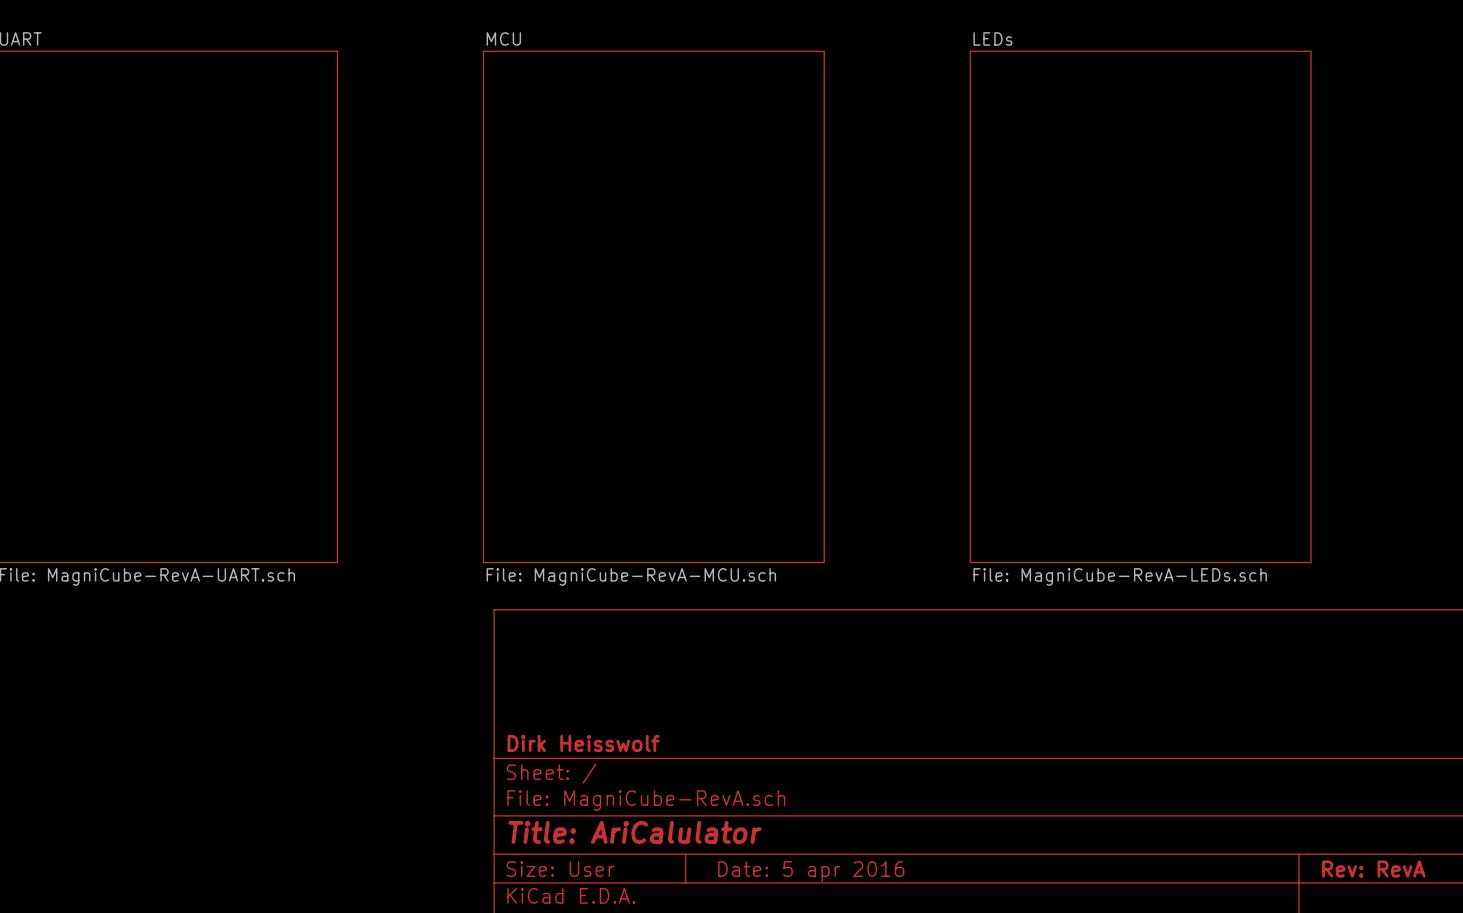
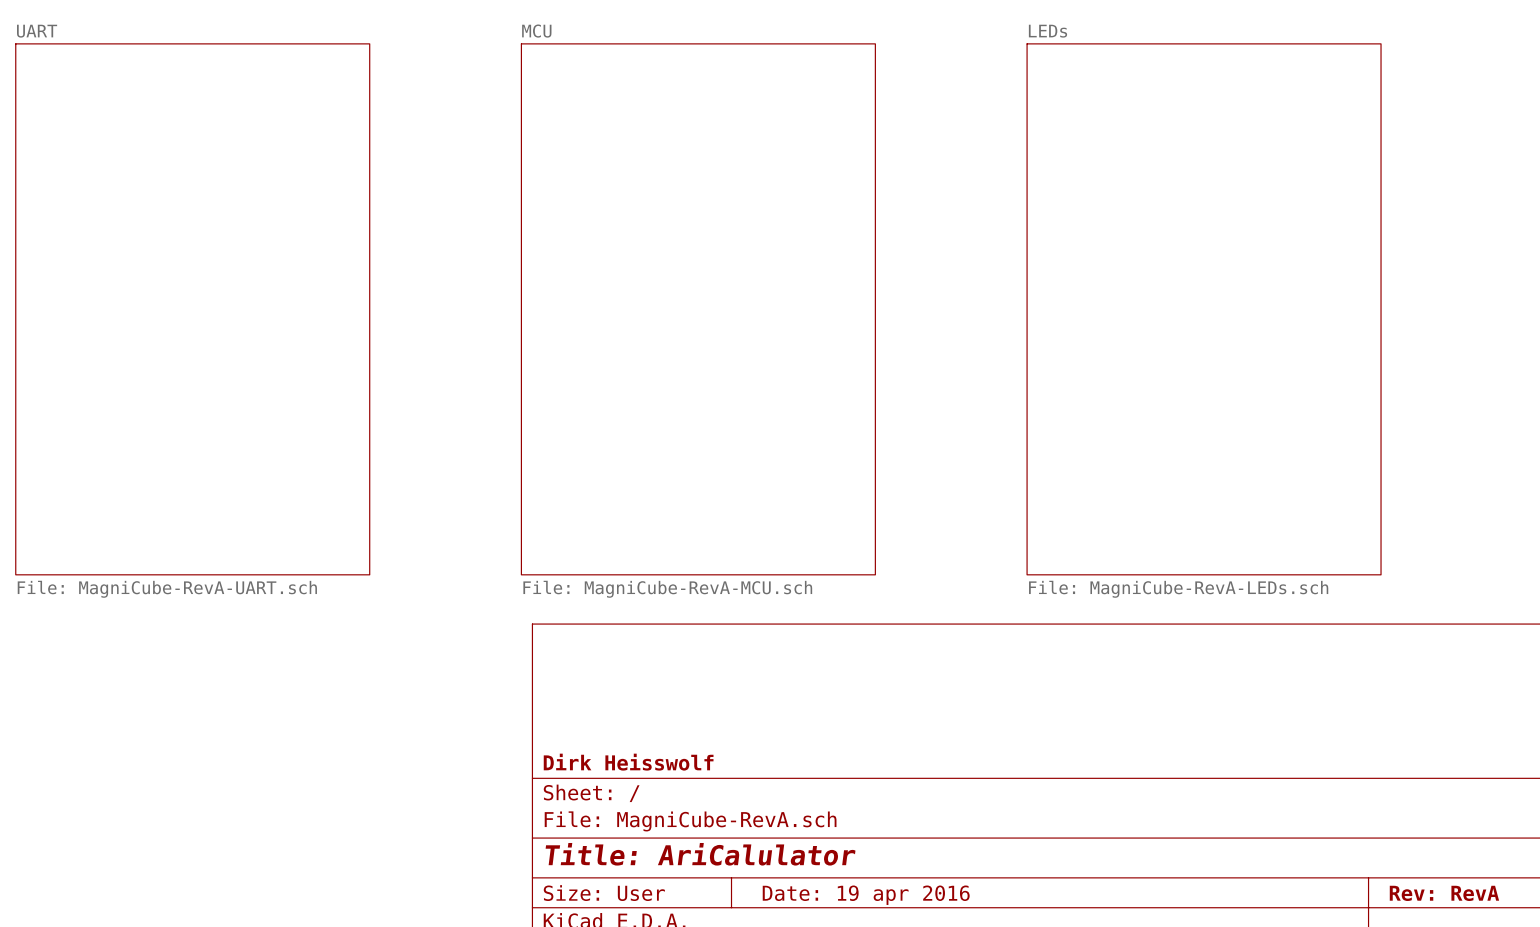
title block: Date: 5 apr 2016 (811, 871) -> Date: 19 apr 2016 (866, 895)

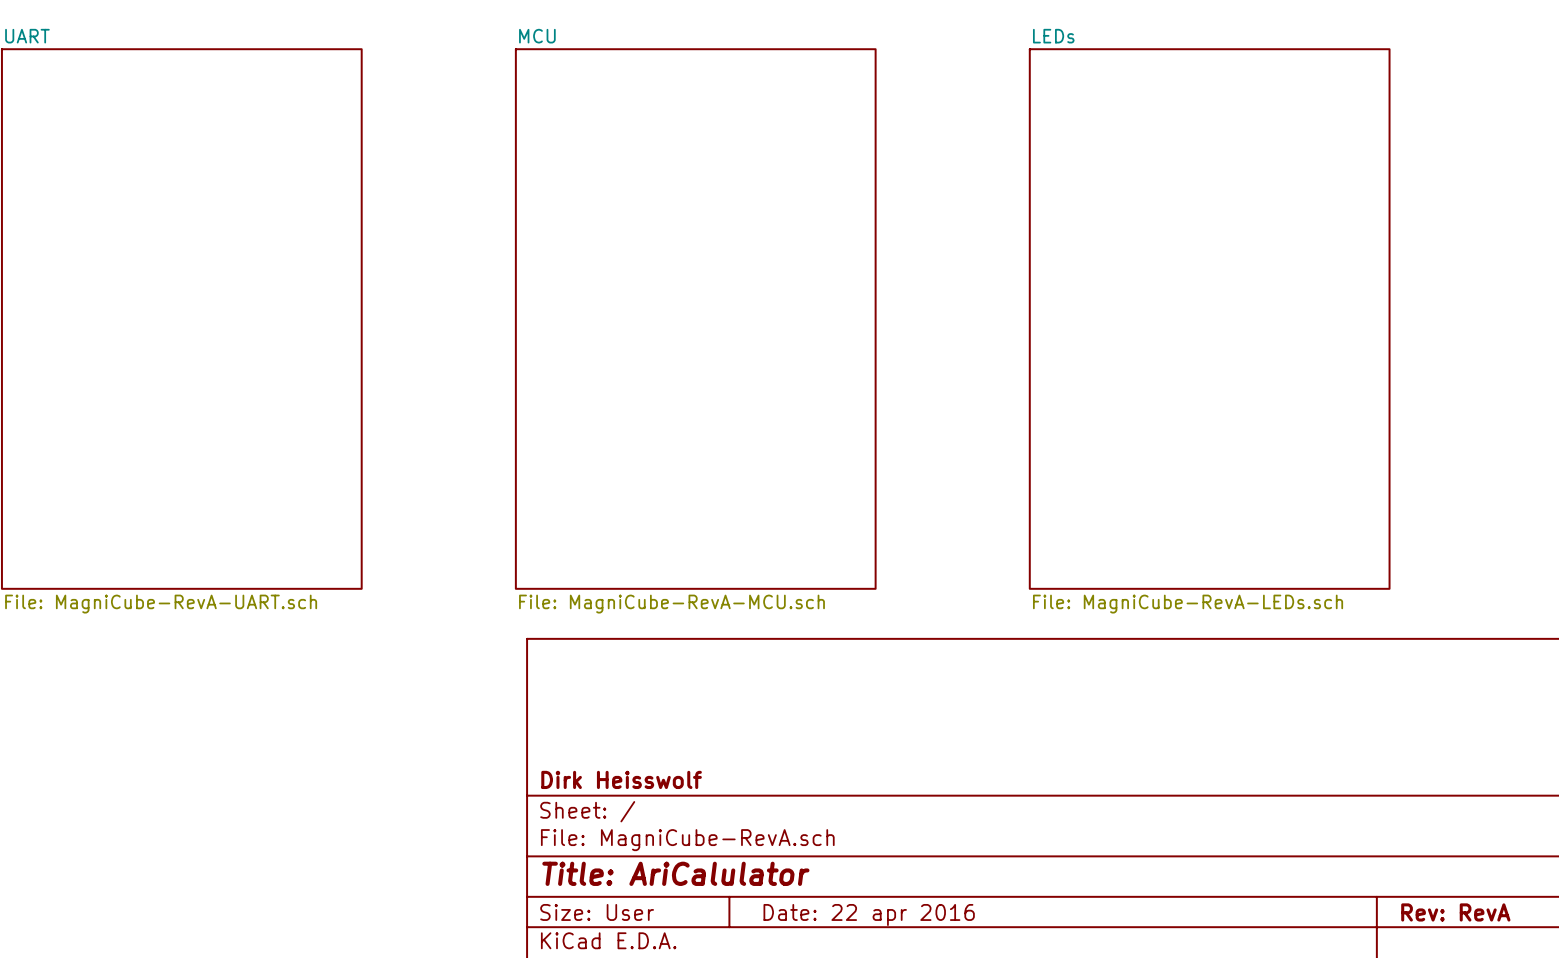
title block: Date: 19 apr 2016 (866, 895) -> Date: 22 apr 2016 (869, 914)

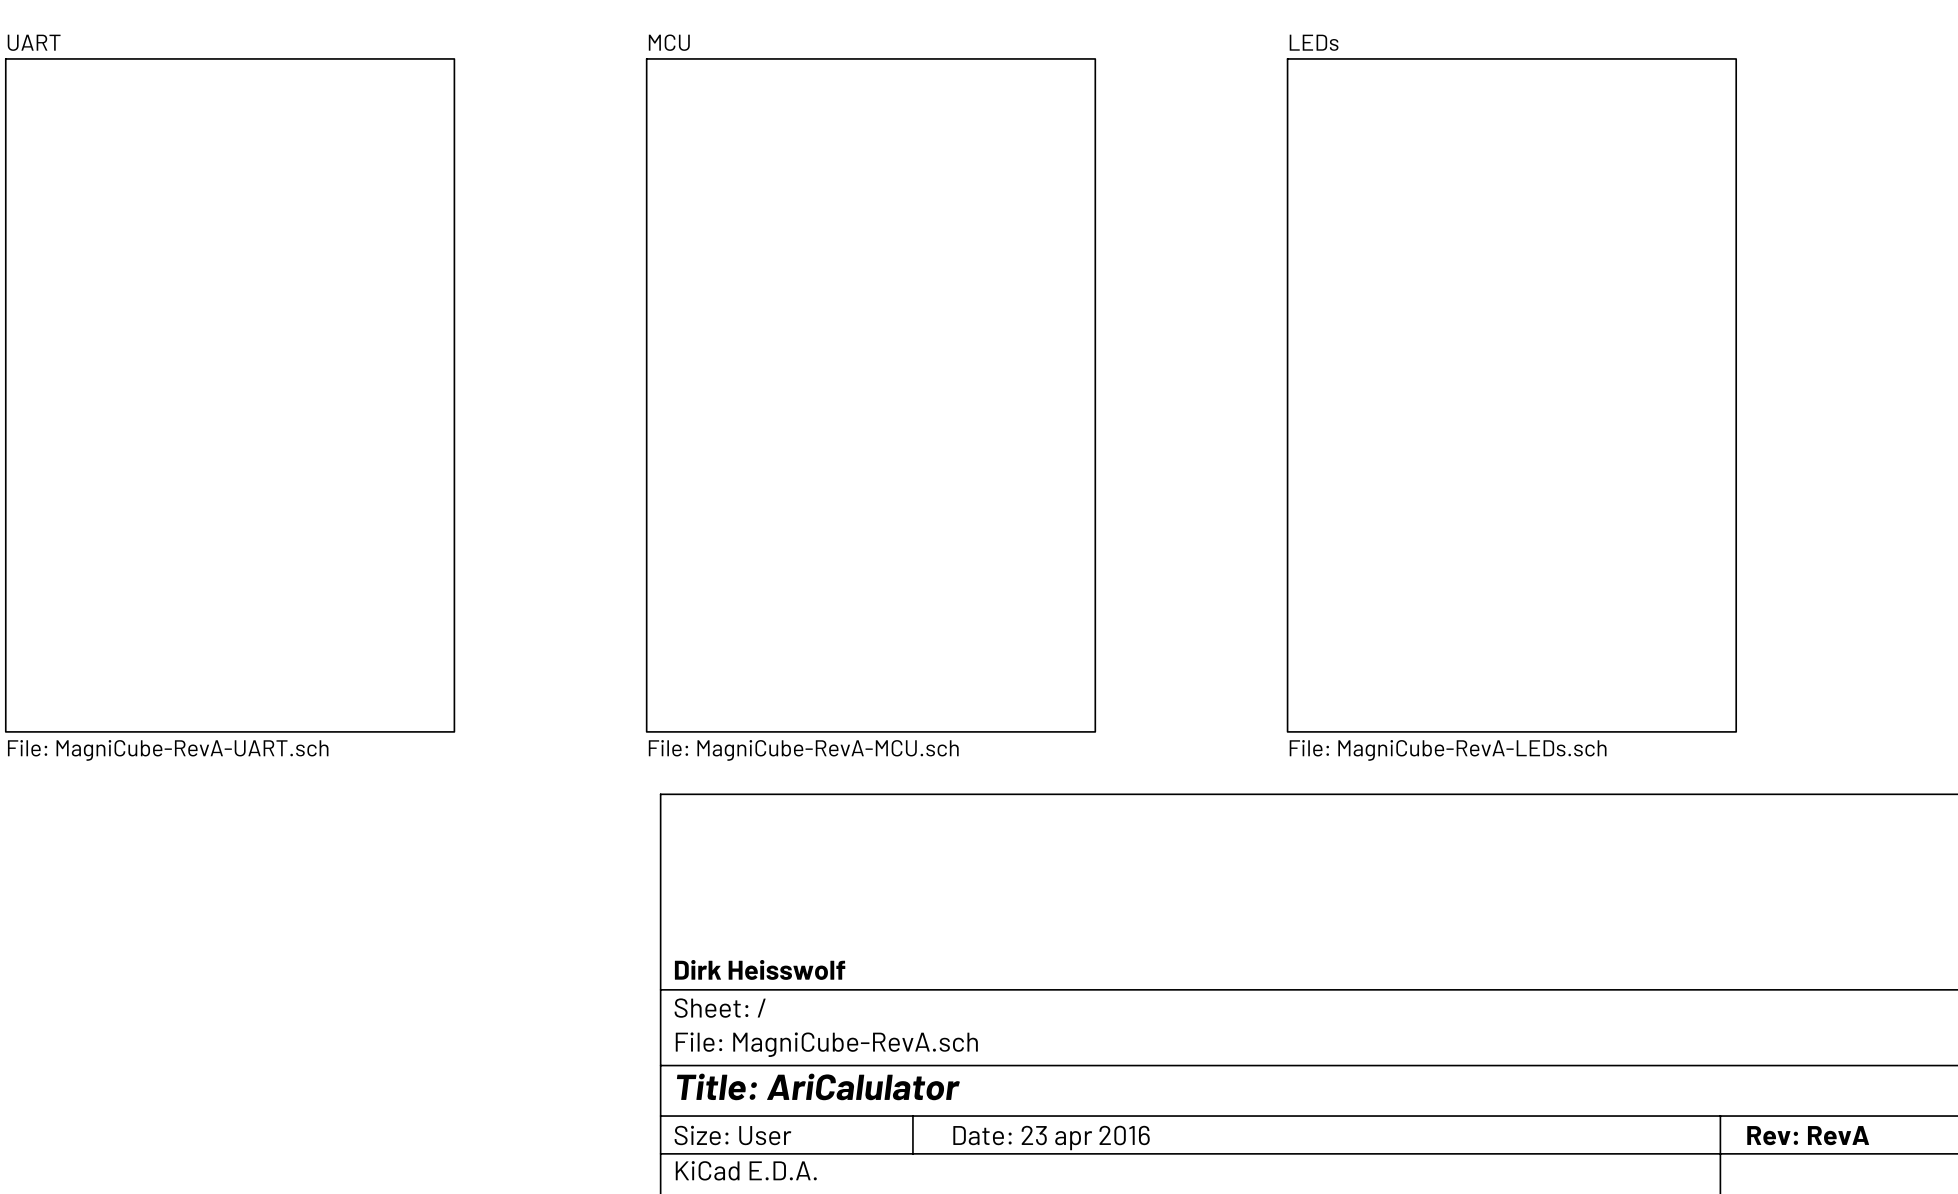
title block: Date: 22 apr 2016 (869, 914) -> Date: 23 apr 2016 (1051, 1138)

